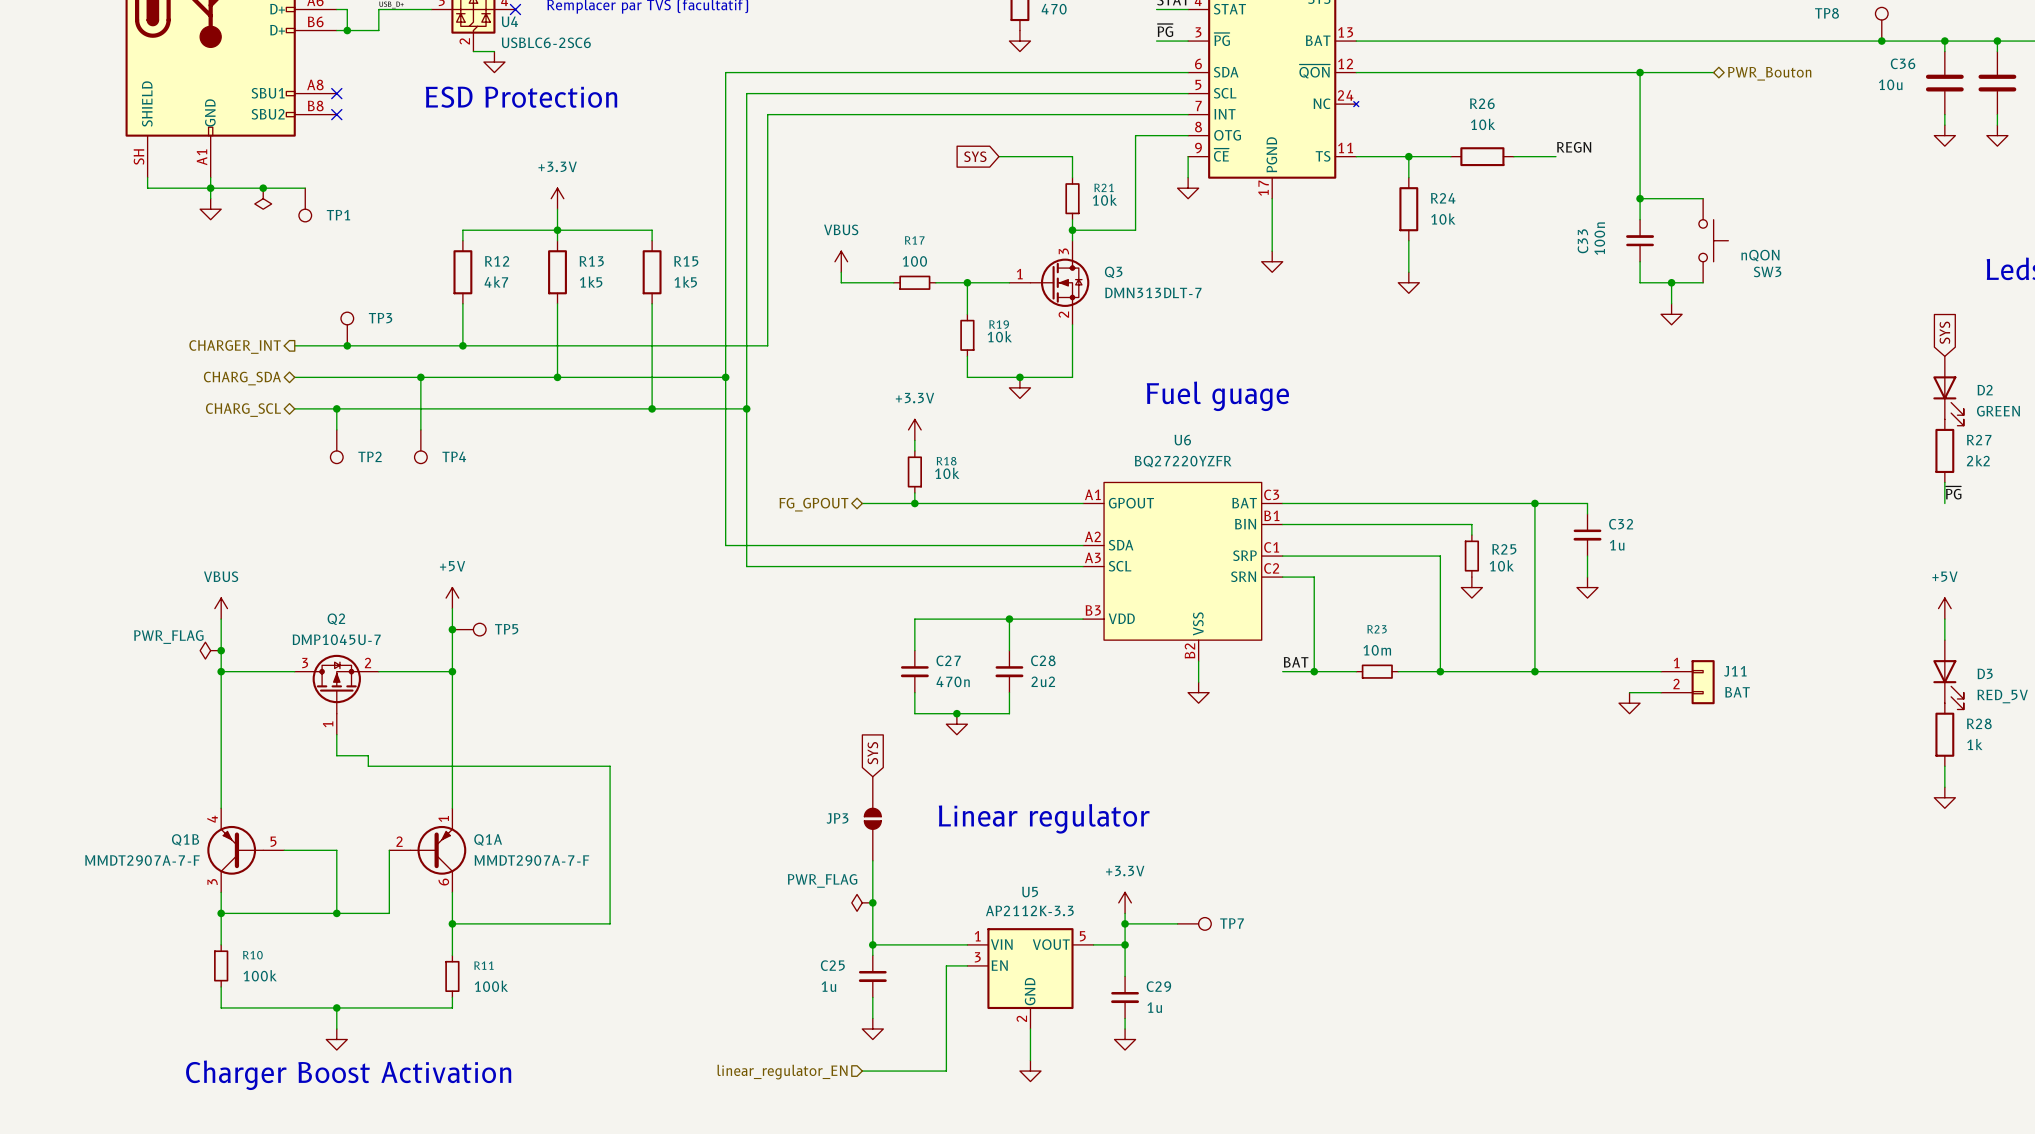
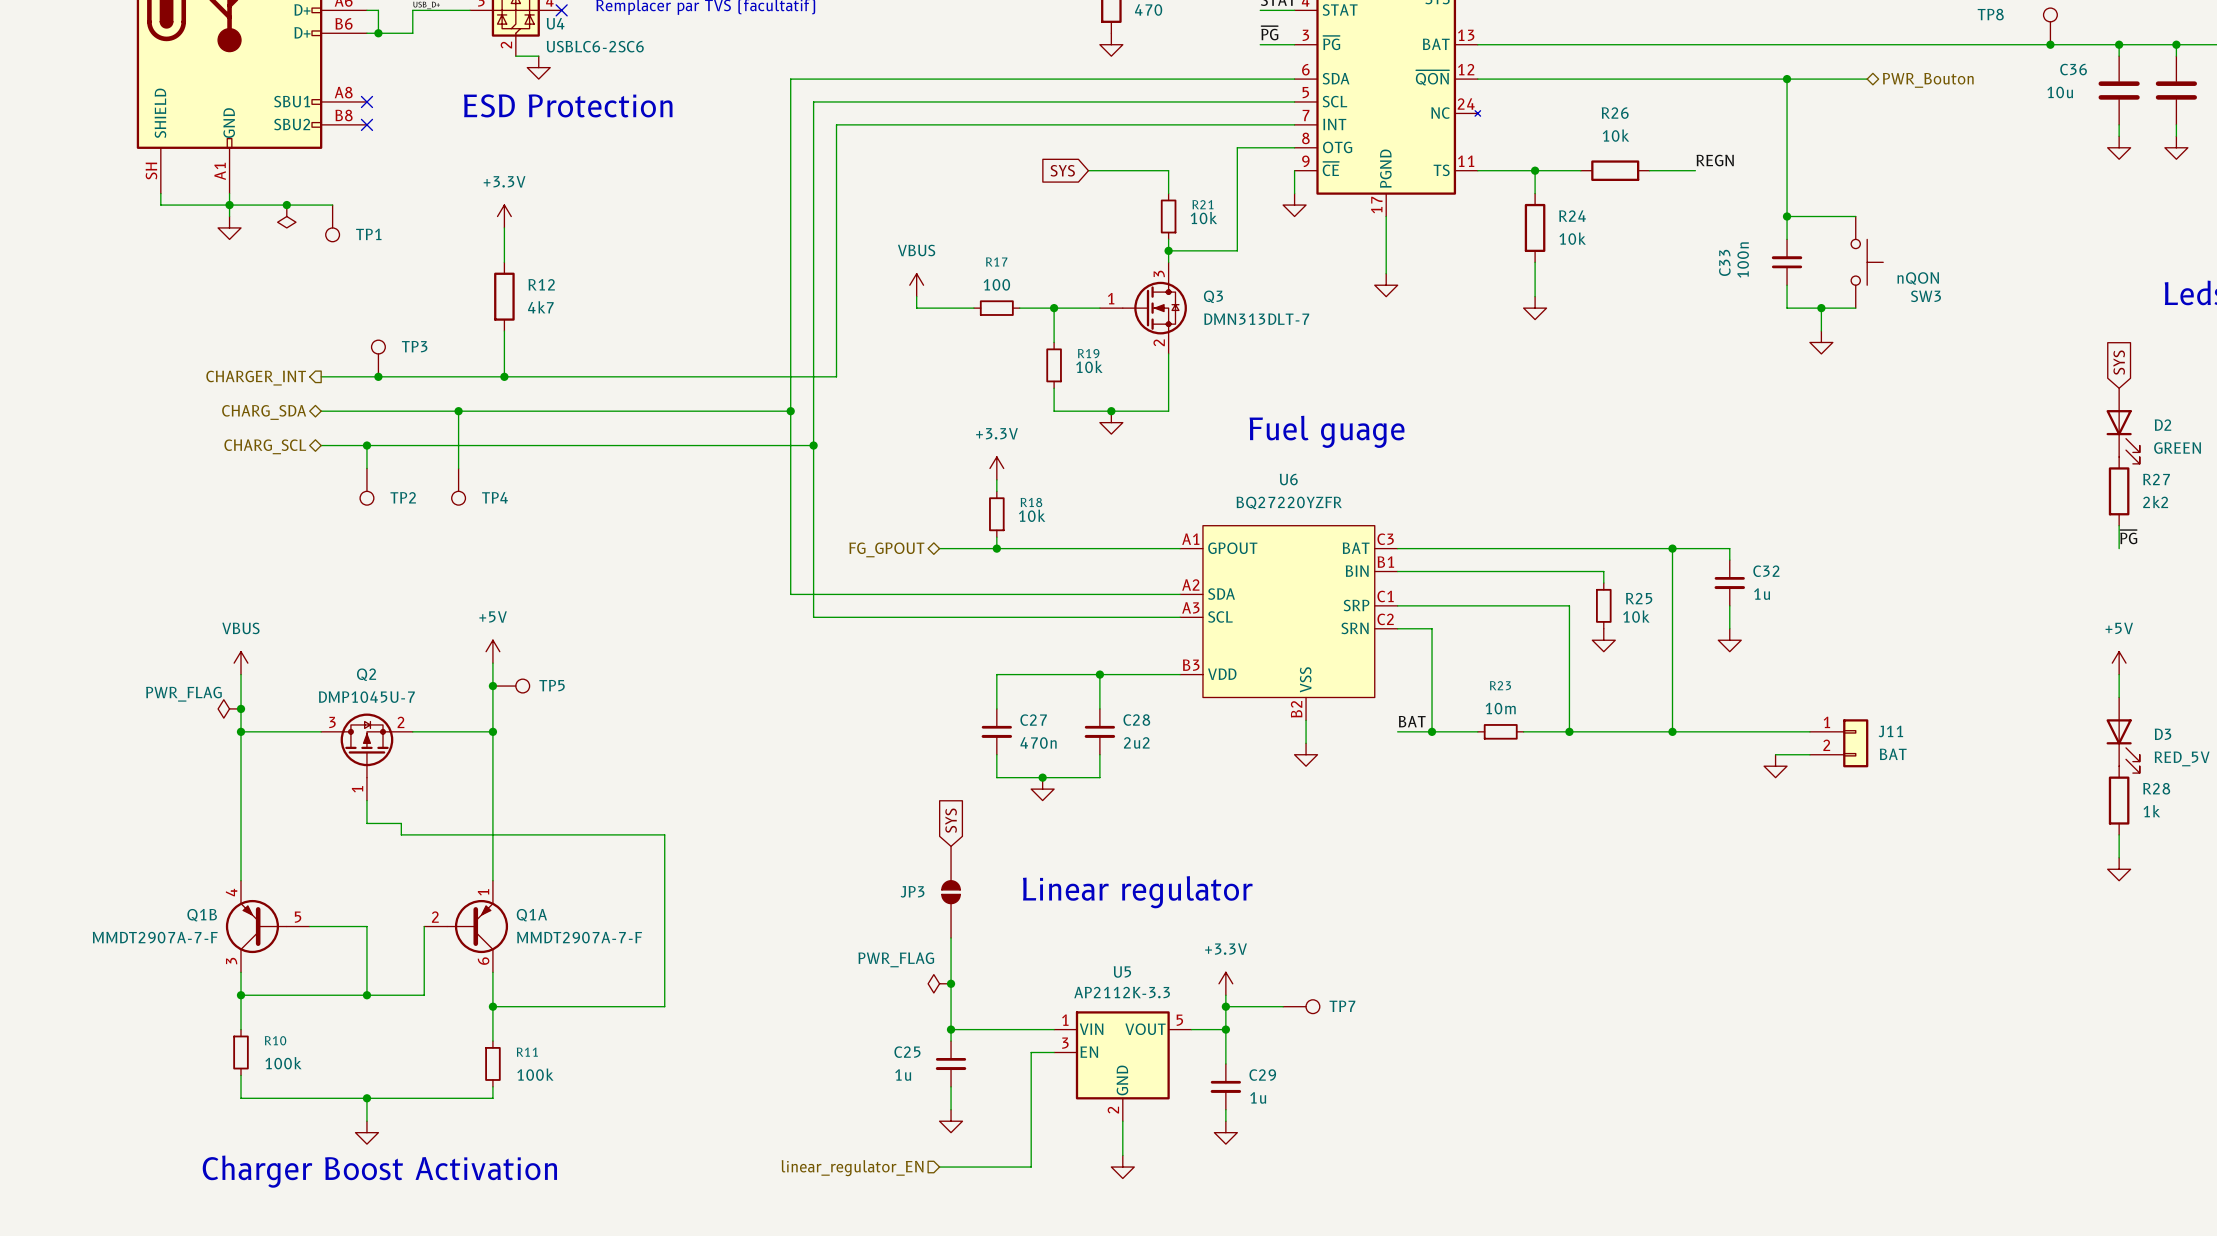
power symbol position: +3.3V (557, 198) -> +3.3V (504, 216)
wire: (557, 209) (557, 240) -> none
wire: (462, 230) (652, 230) (652, 240) -> (504, 250) (504, 227)
junction: (557, 230) -> none
R13: 1k5 (557, 272) -> none
R15: 1k5 (652, 272) -> none
wire: (557, 303) (557, 377) -> none
wire: (652, 303) (652, 408) -> none
junction: (557, 377) -> none
junction: (652, 408) -> none

